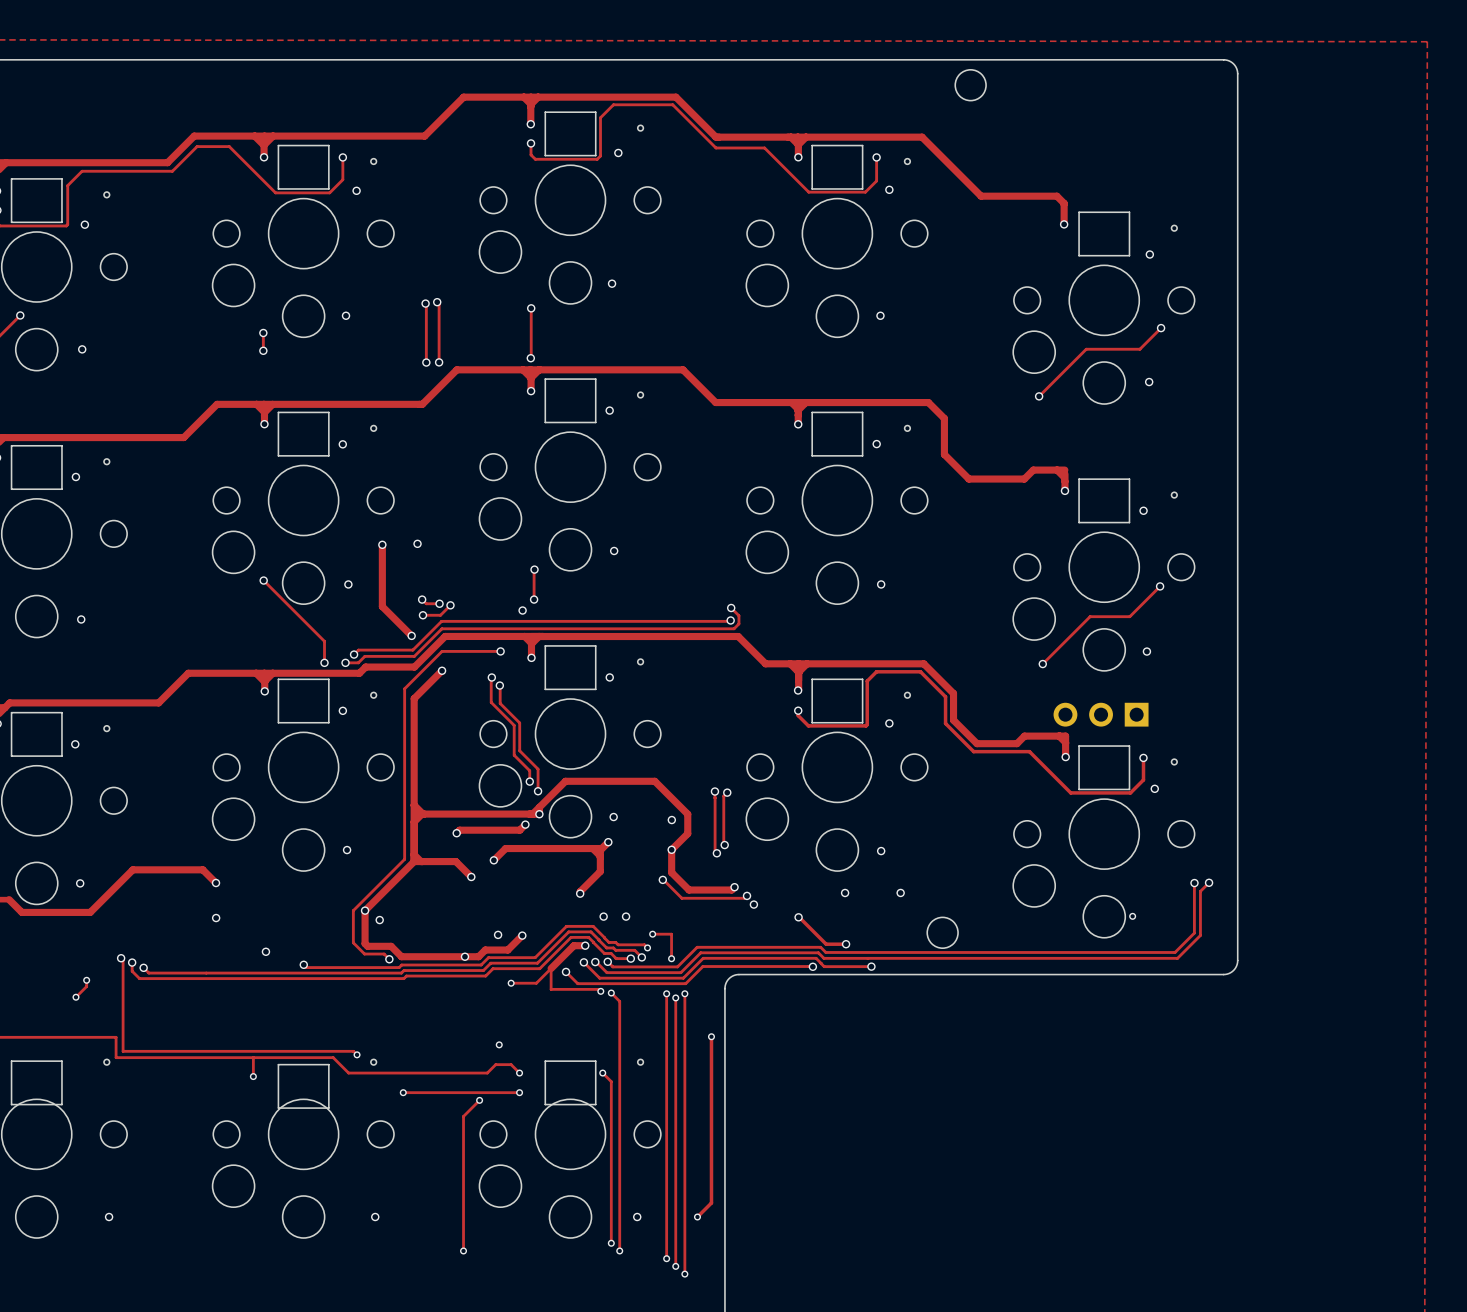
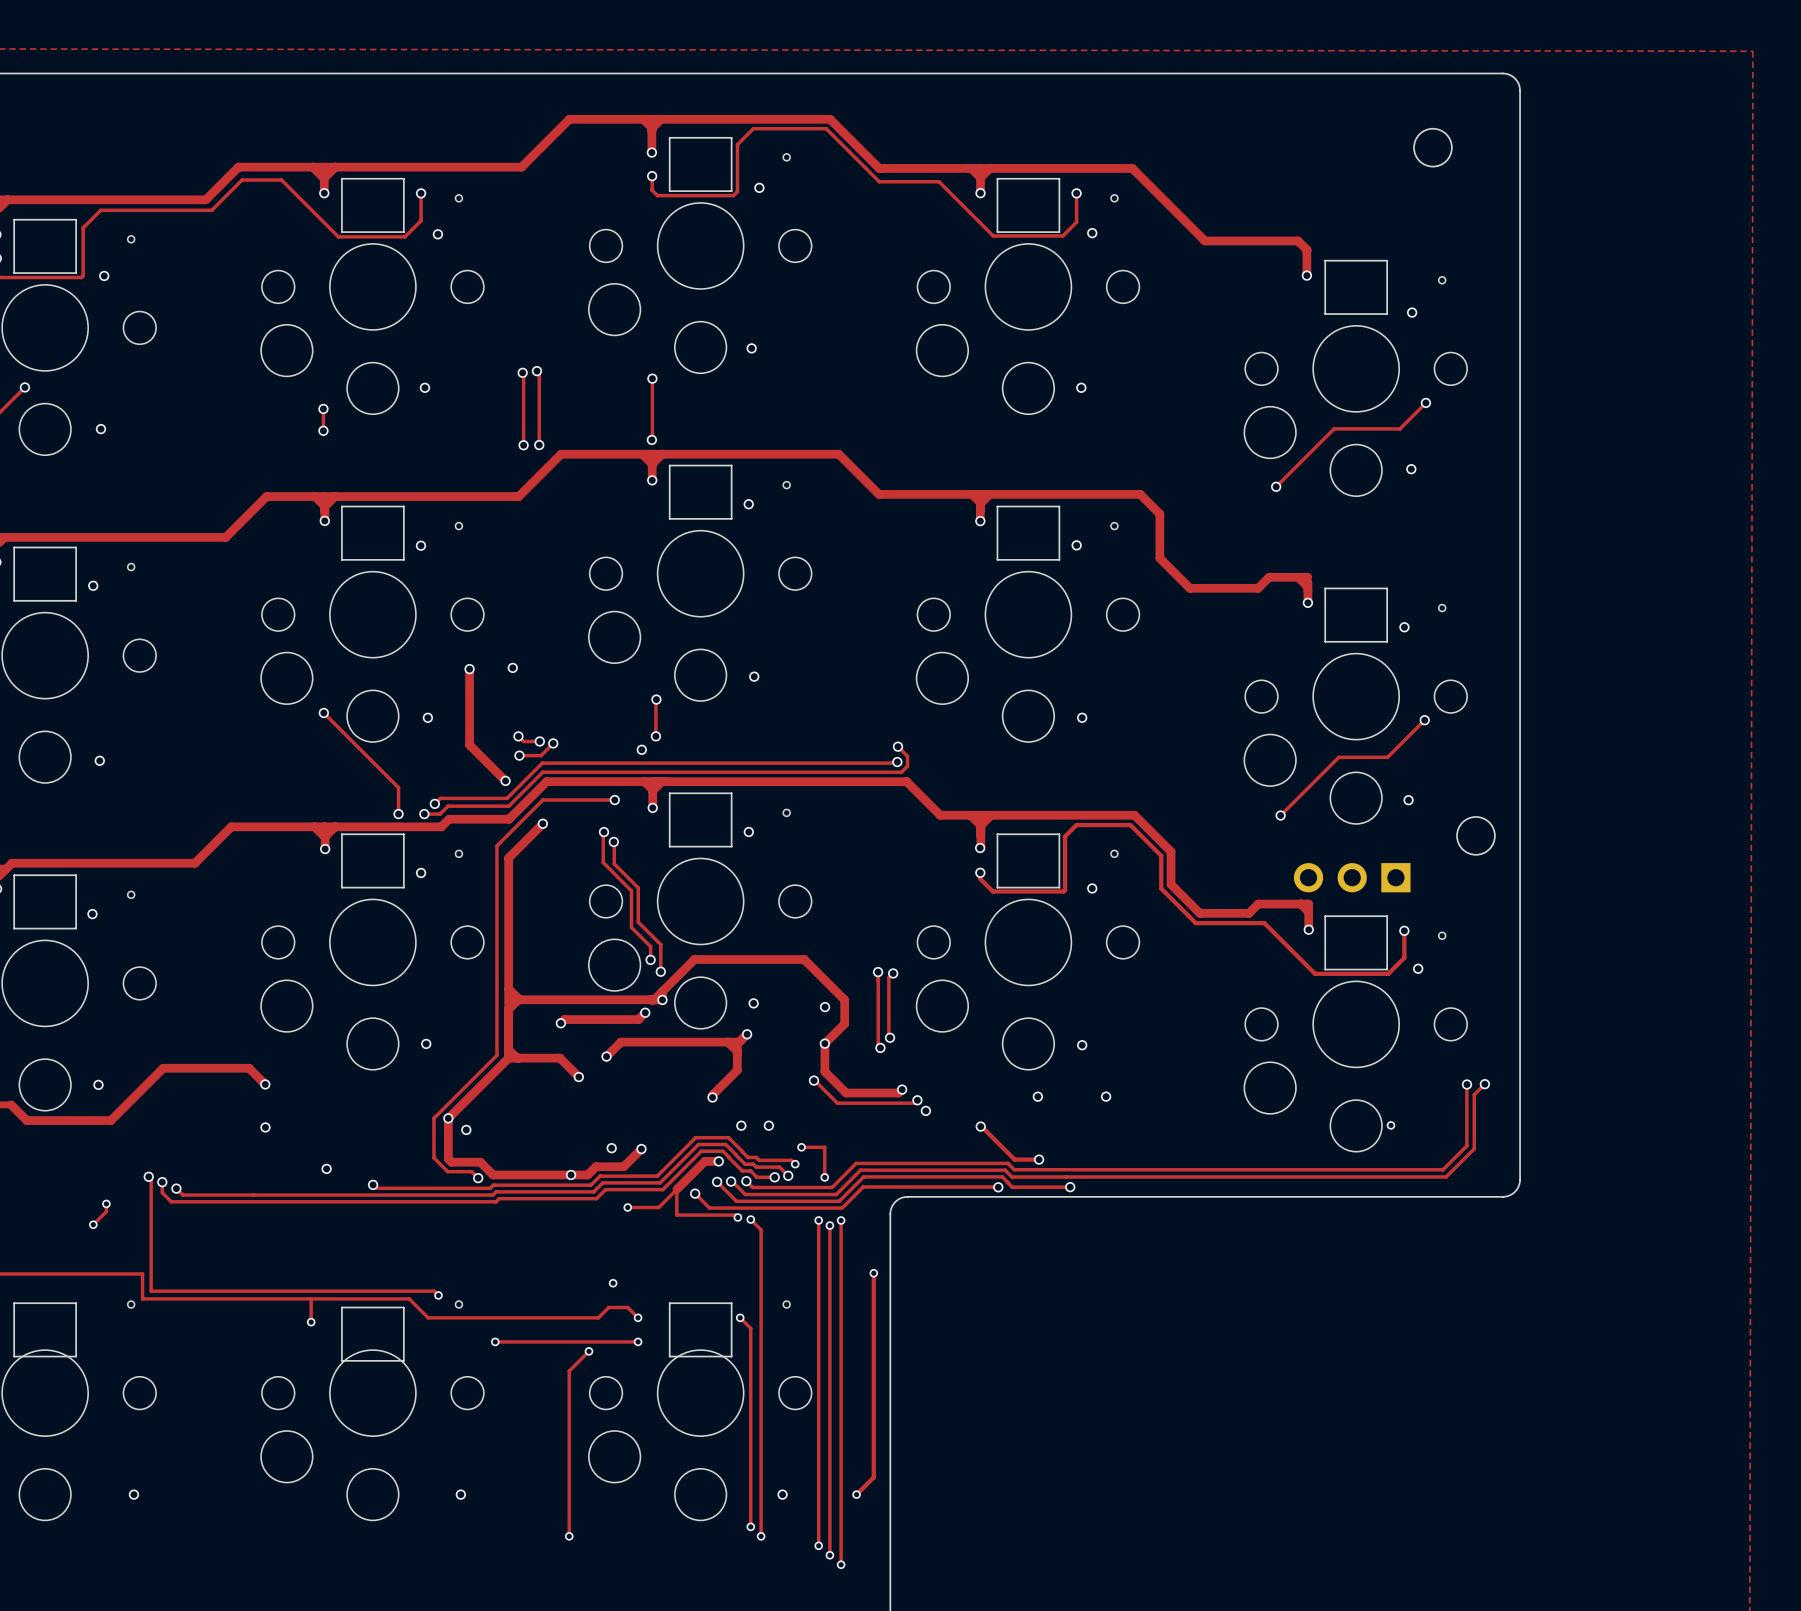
round board edge position: (970, 85) -> (1432, 147)
round board edge: none -> [1456, 816, 1496, 856]
round board edge: [926, 916, 959, 949] -> none

